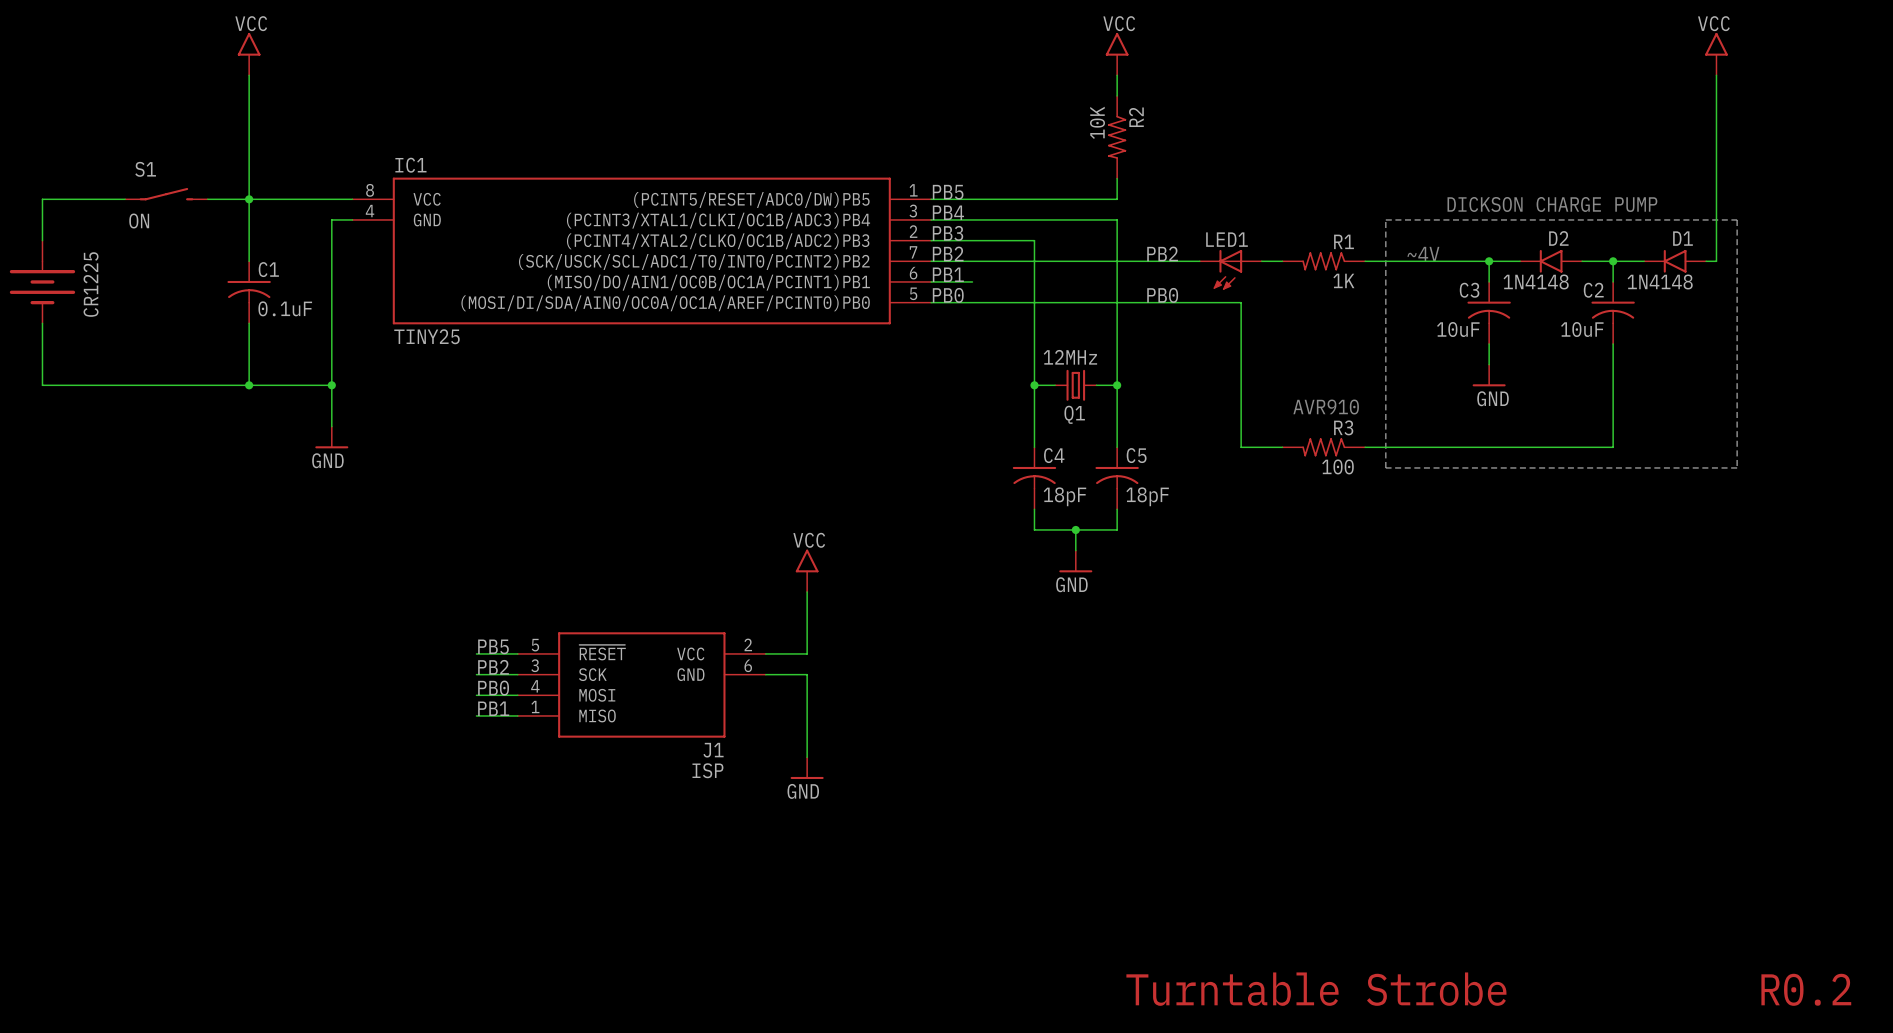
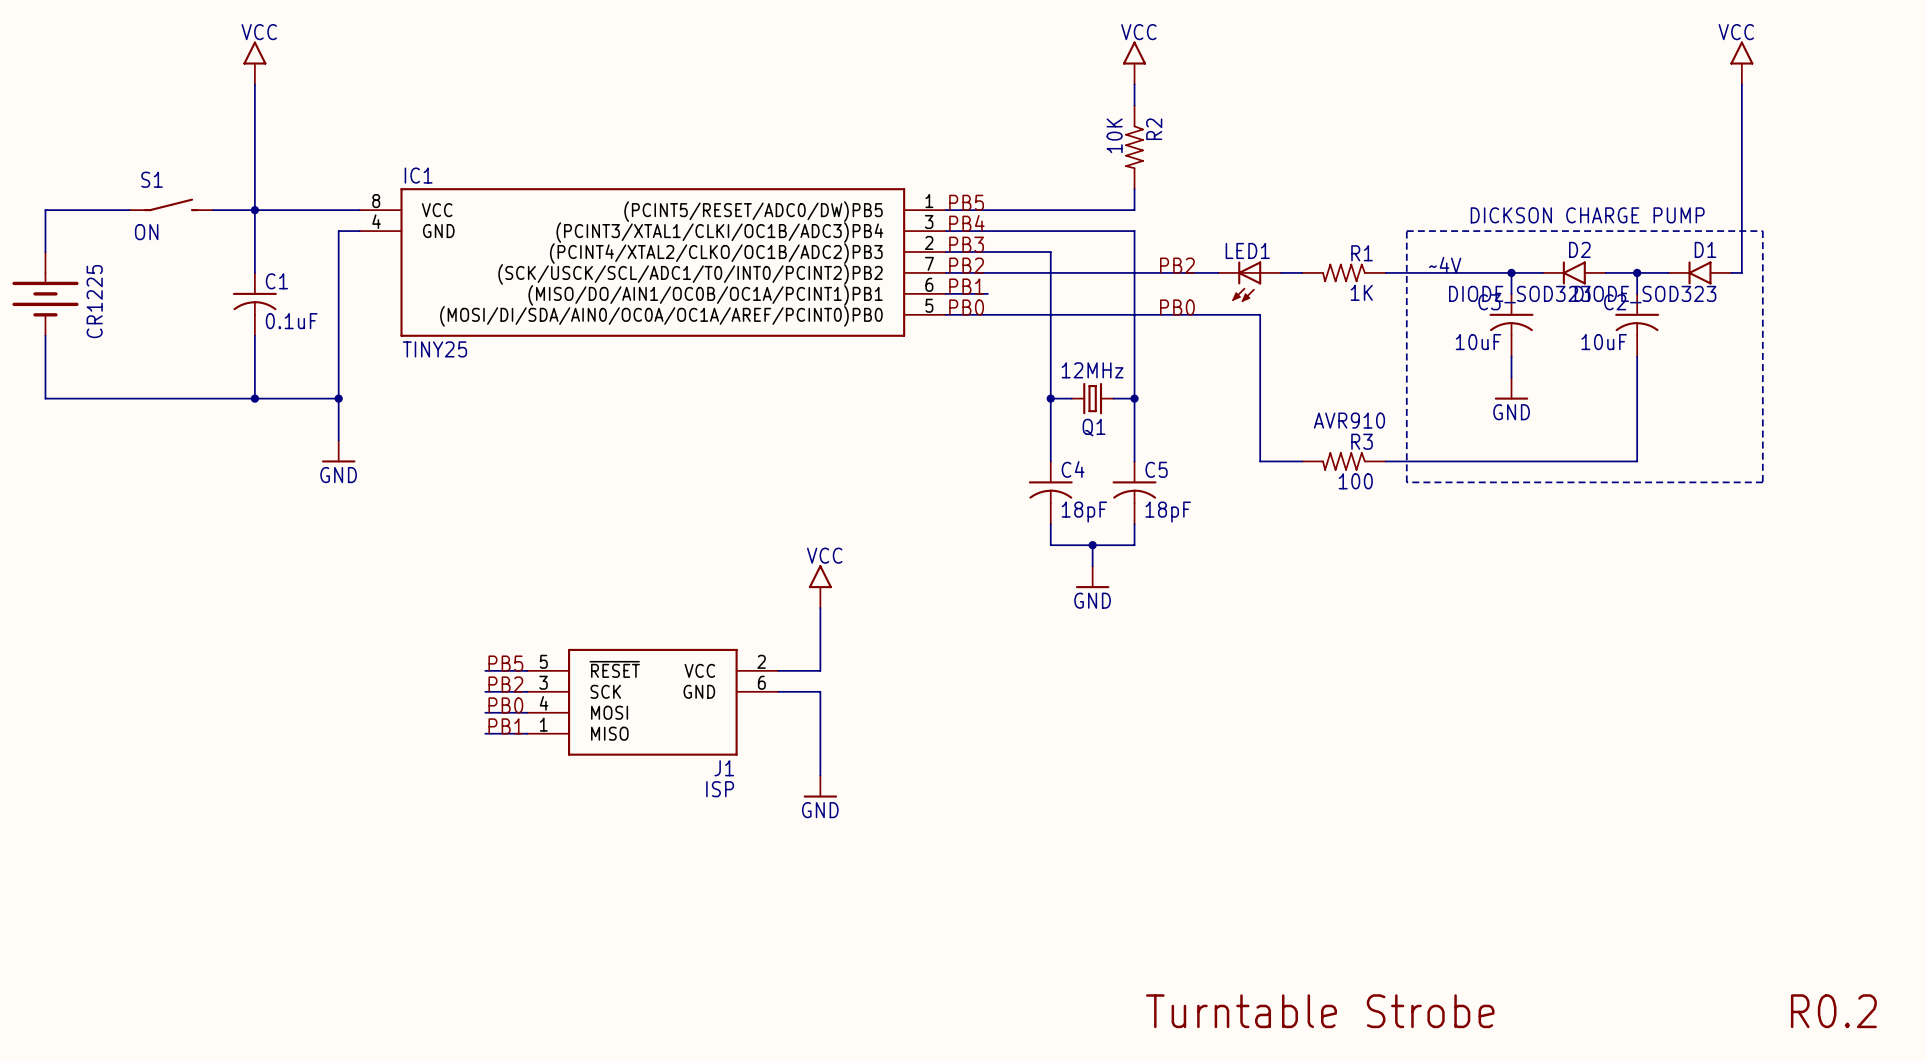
D2 value: 1N4148 (1536, 281) -> DIODE_SOD323 (1519, 294)
D1 value: 1N4148 (1660, 281) -> DIODE_SOD323 (1645, 294)

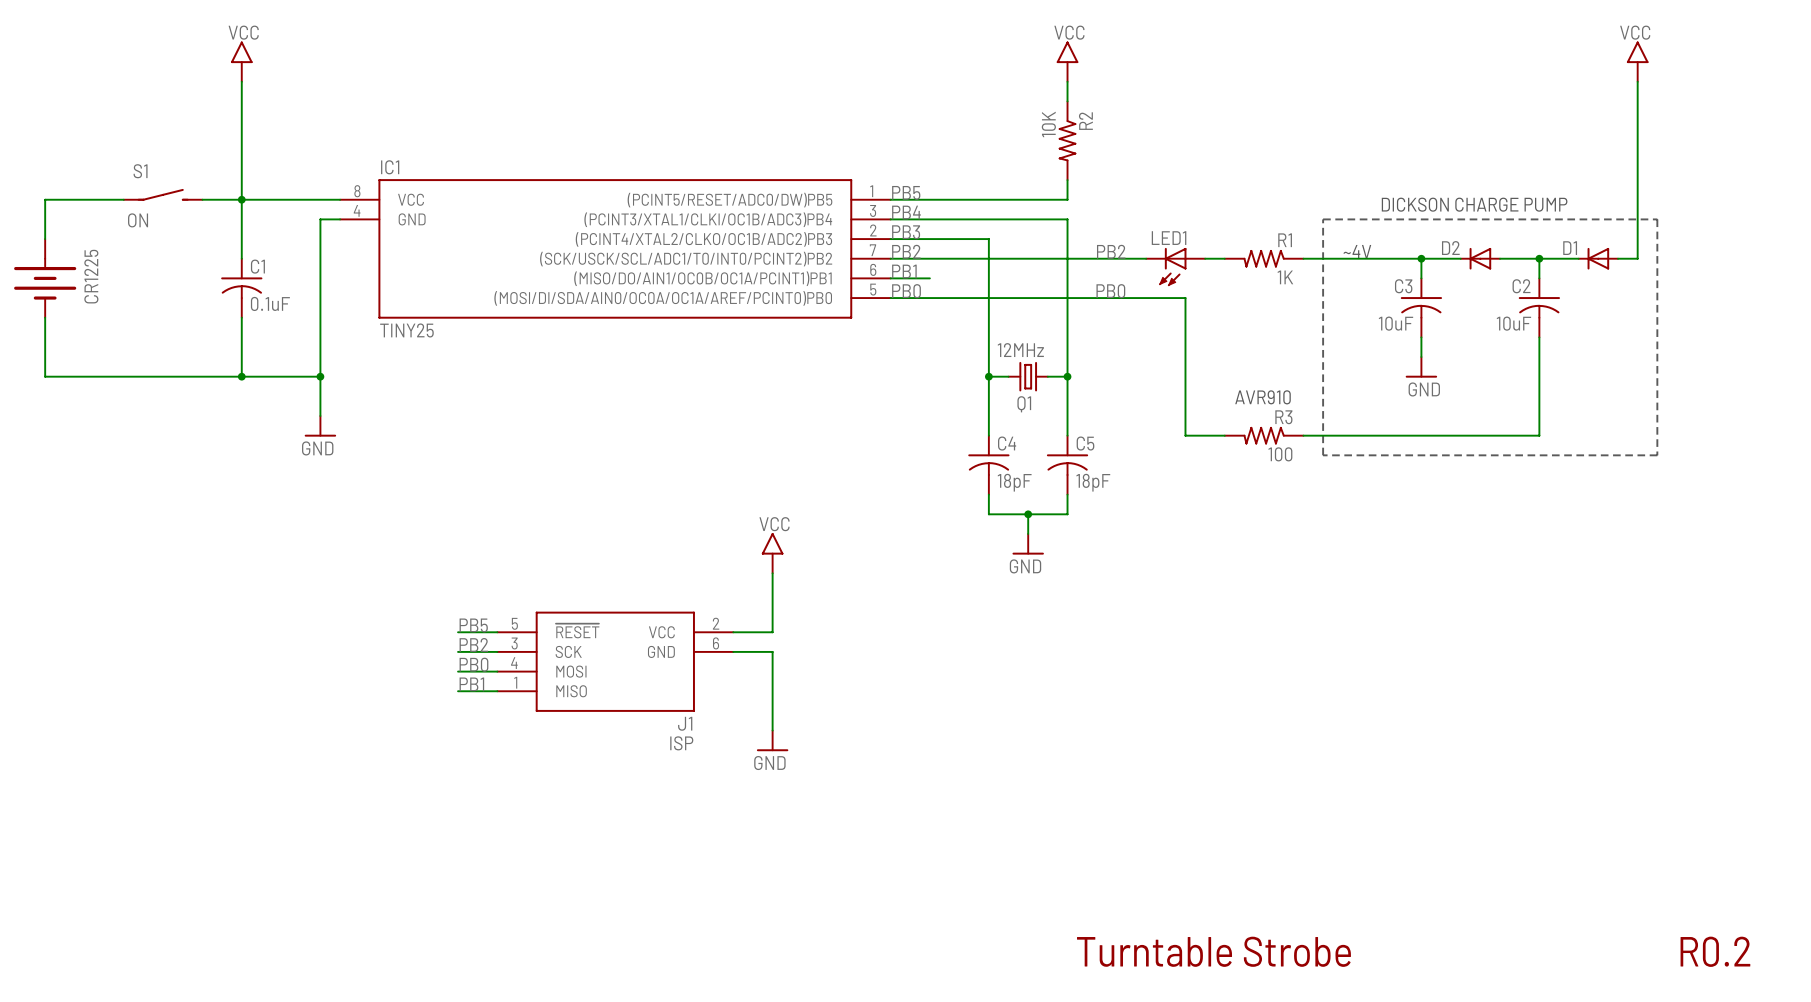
D2 name position: D2 (1579, 249) -> D2 (1450, 248)
D1 name position: D1 (1705, 249) -> D1 (1570, 248)
D2 symbol: [1542, 261, 1606, 285] -> [1460, 247, 1501, 270]
D1 symbol: [1668, 261, 1732, 285] -> [1578, 247, 1619, 270]
D2 value: DIODE_SOD323 (1519, 294) -> none
D1 value: DIODE_SOD323 (1645, 294) -> none

